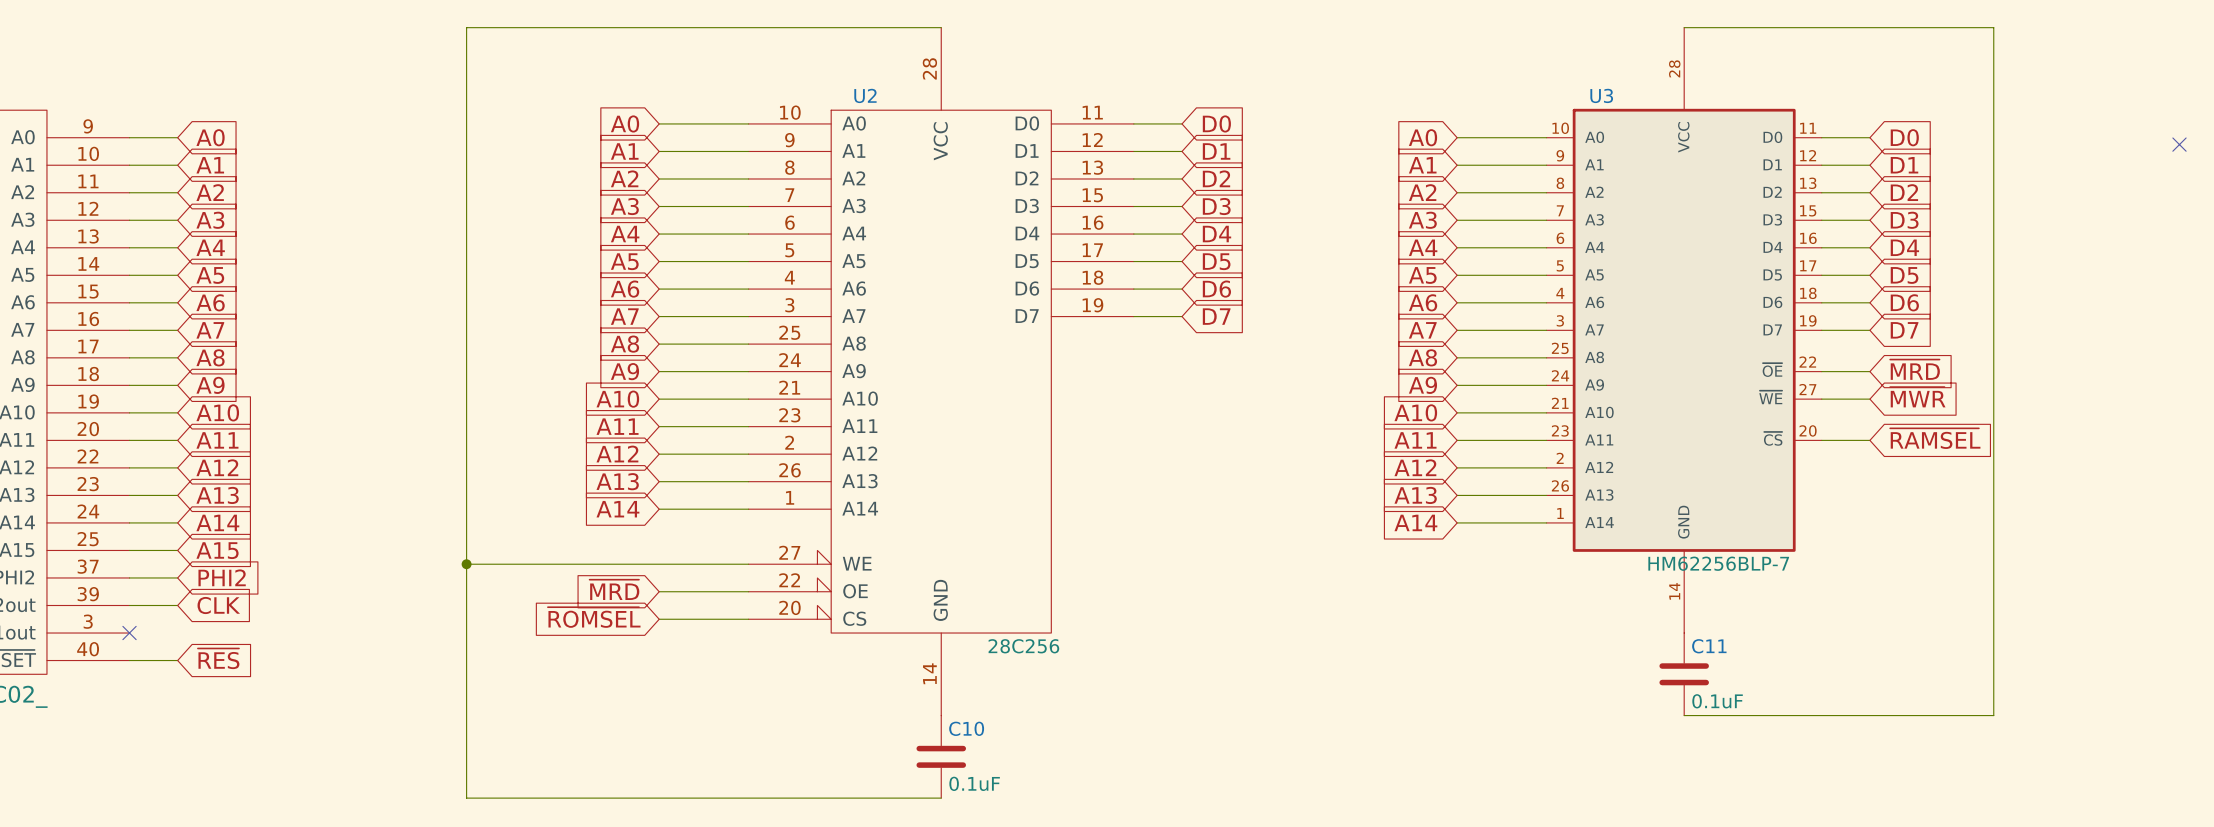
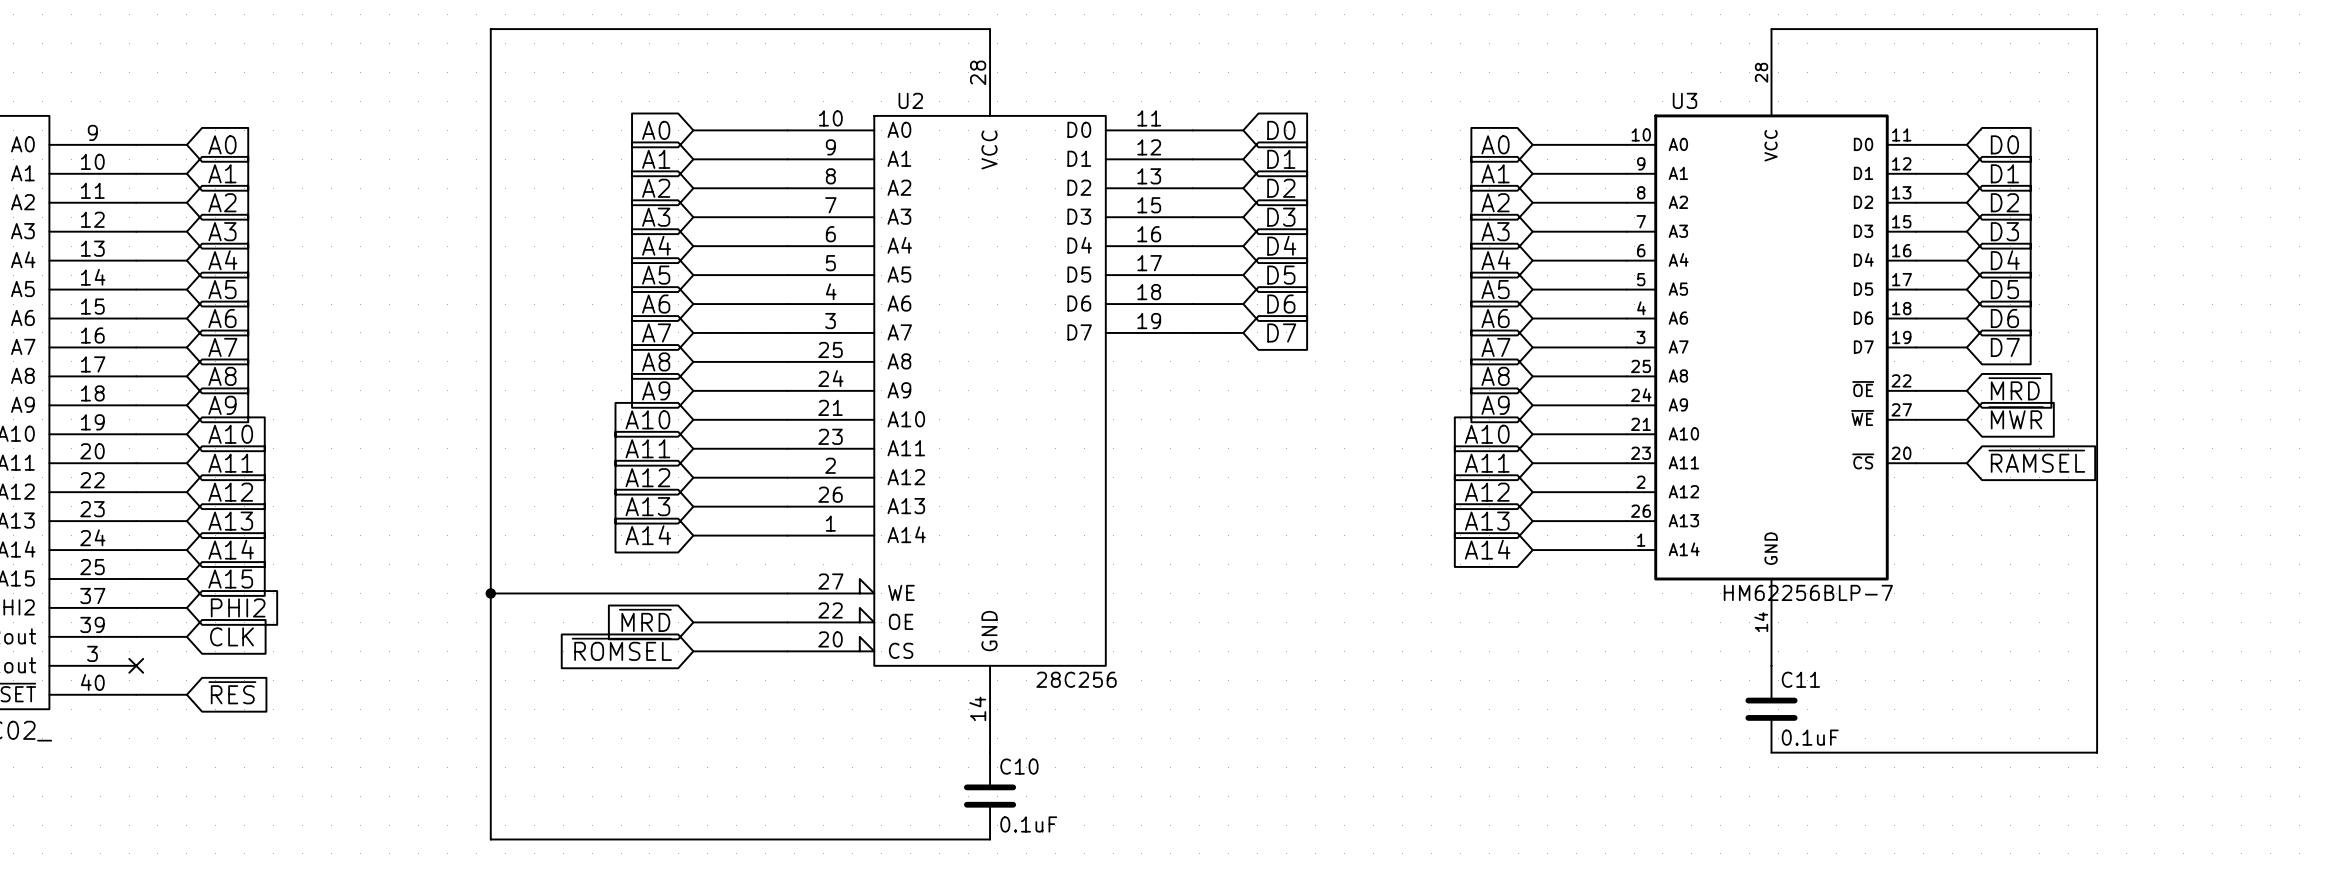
no-connect mark: (2179, 144) -> none

